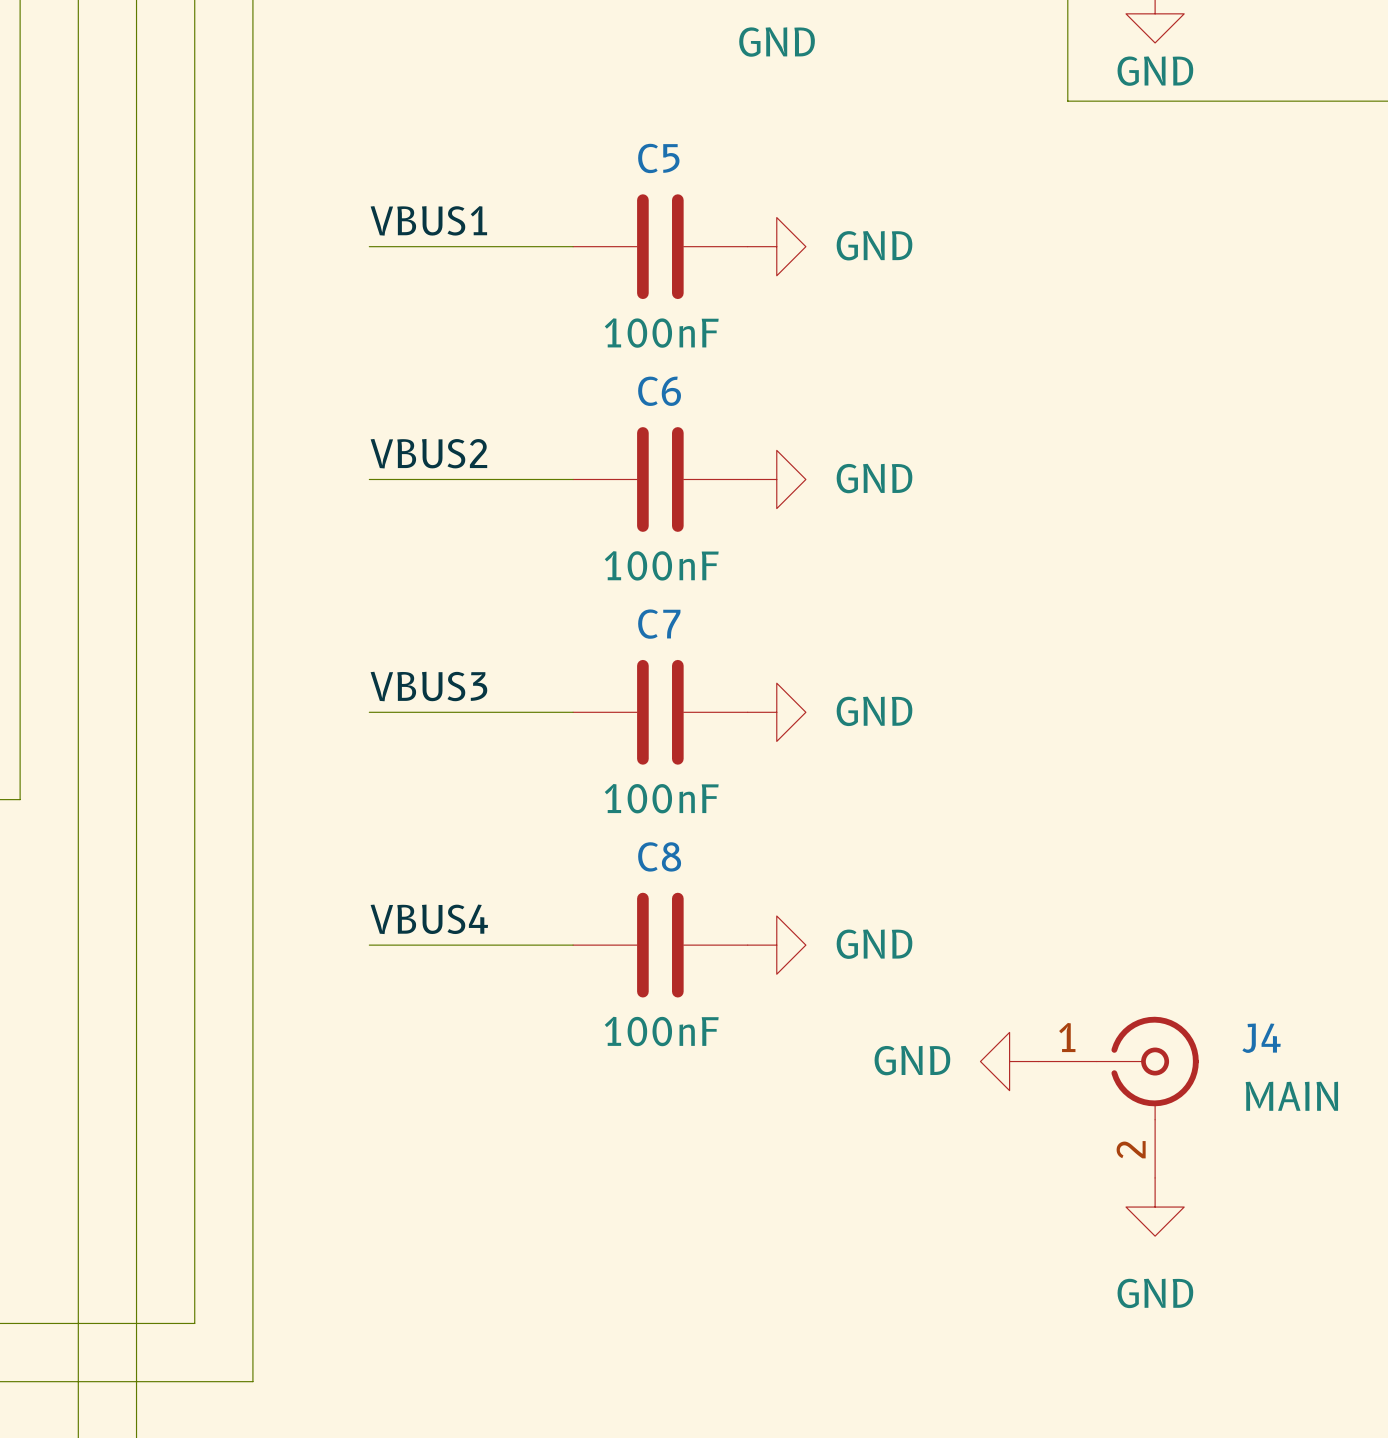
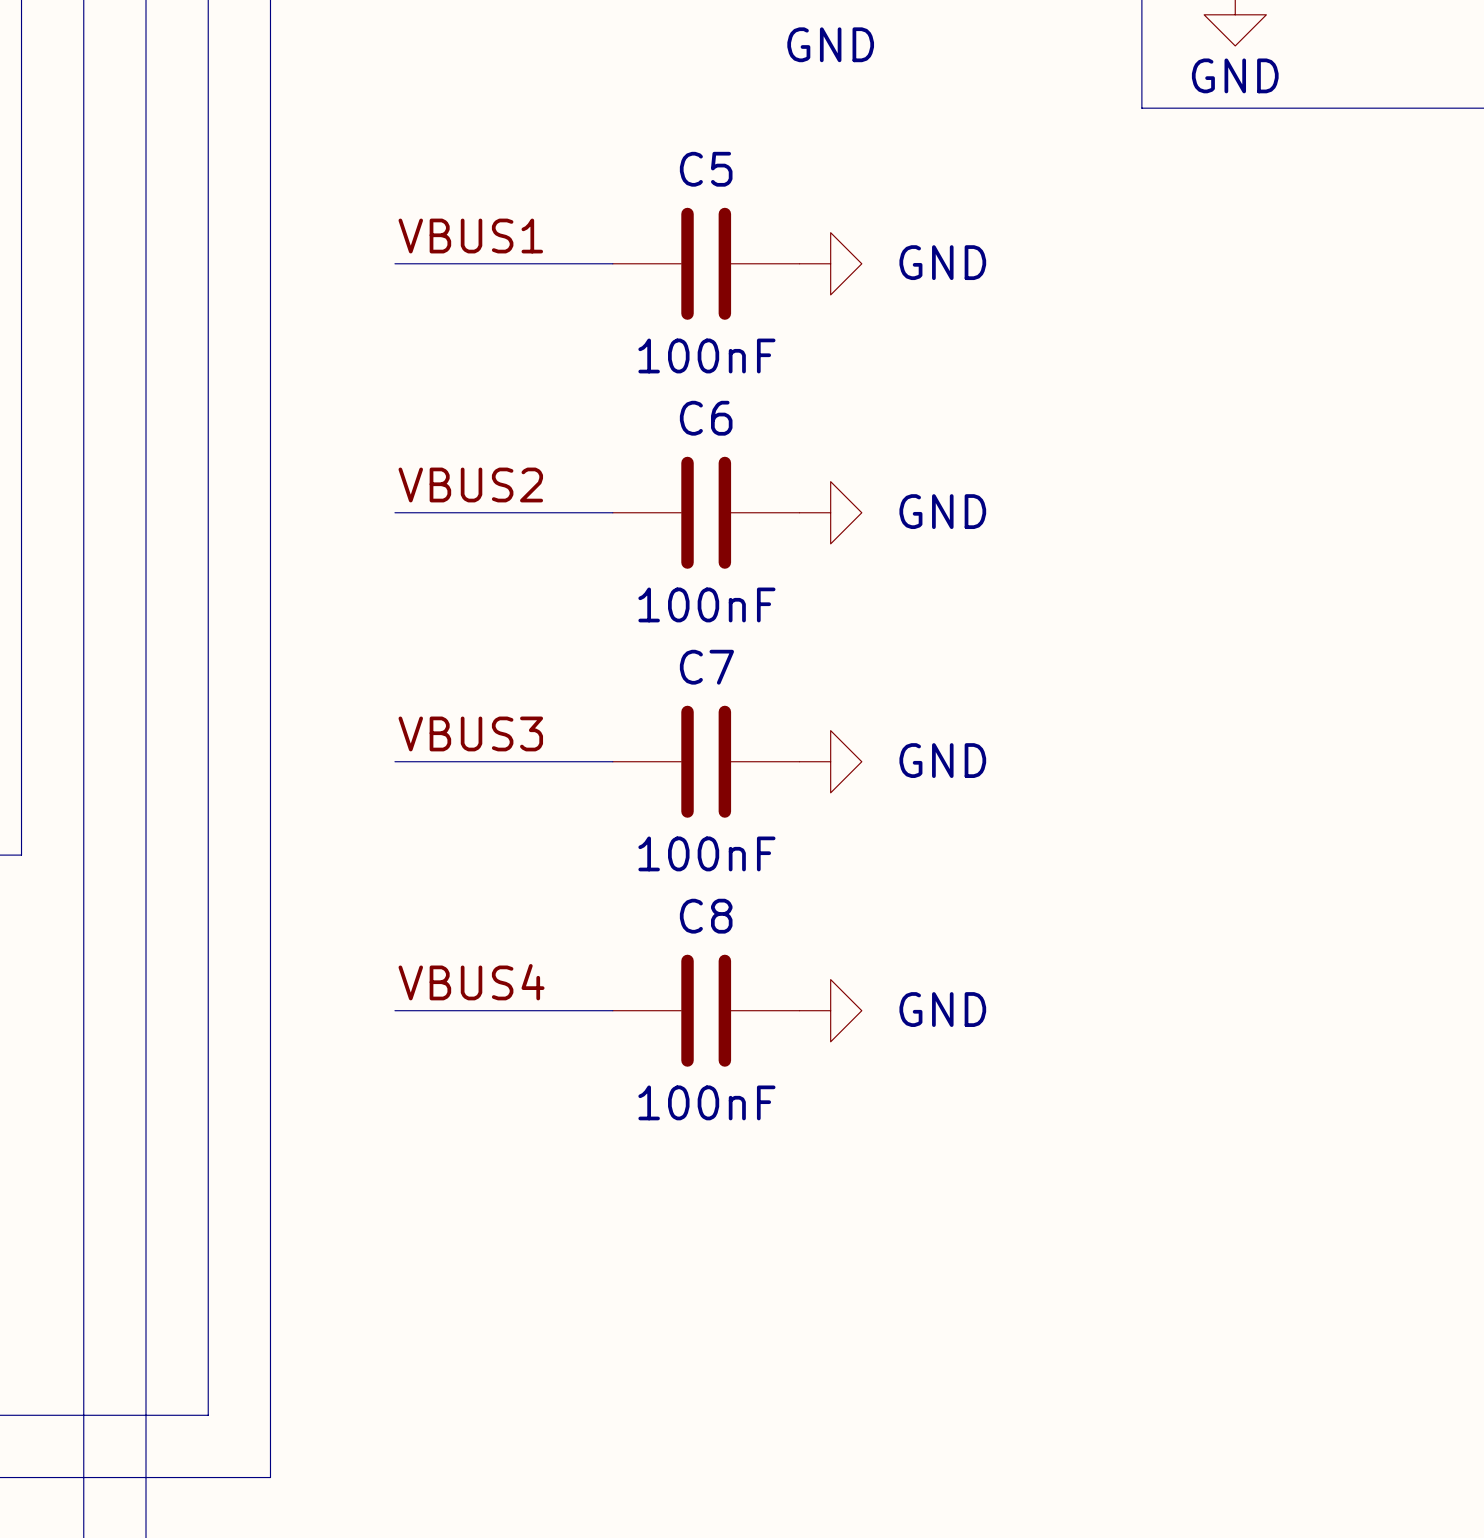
power symbol: GND (1009, 1061) -> none
J4: MAIN (1118, 1097) -> none
power symbol: GND (1155, 1207) -> none

